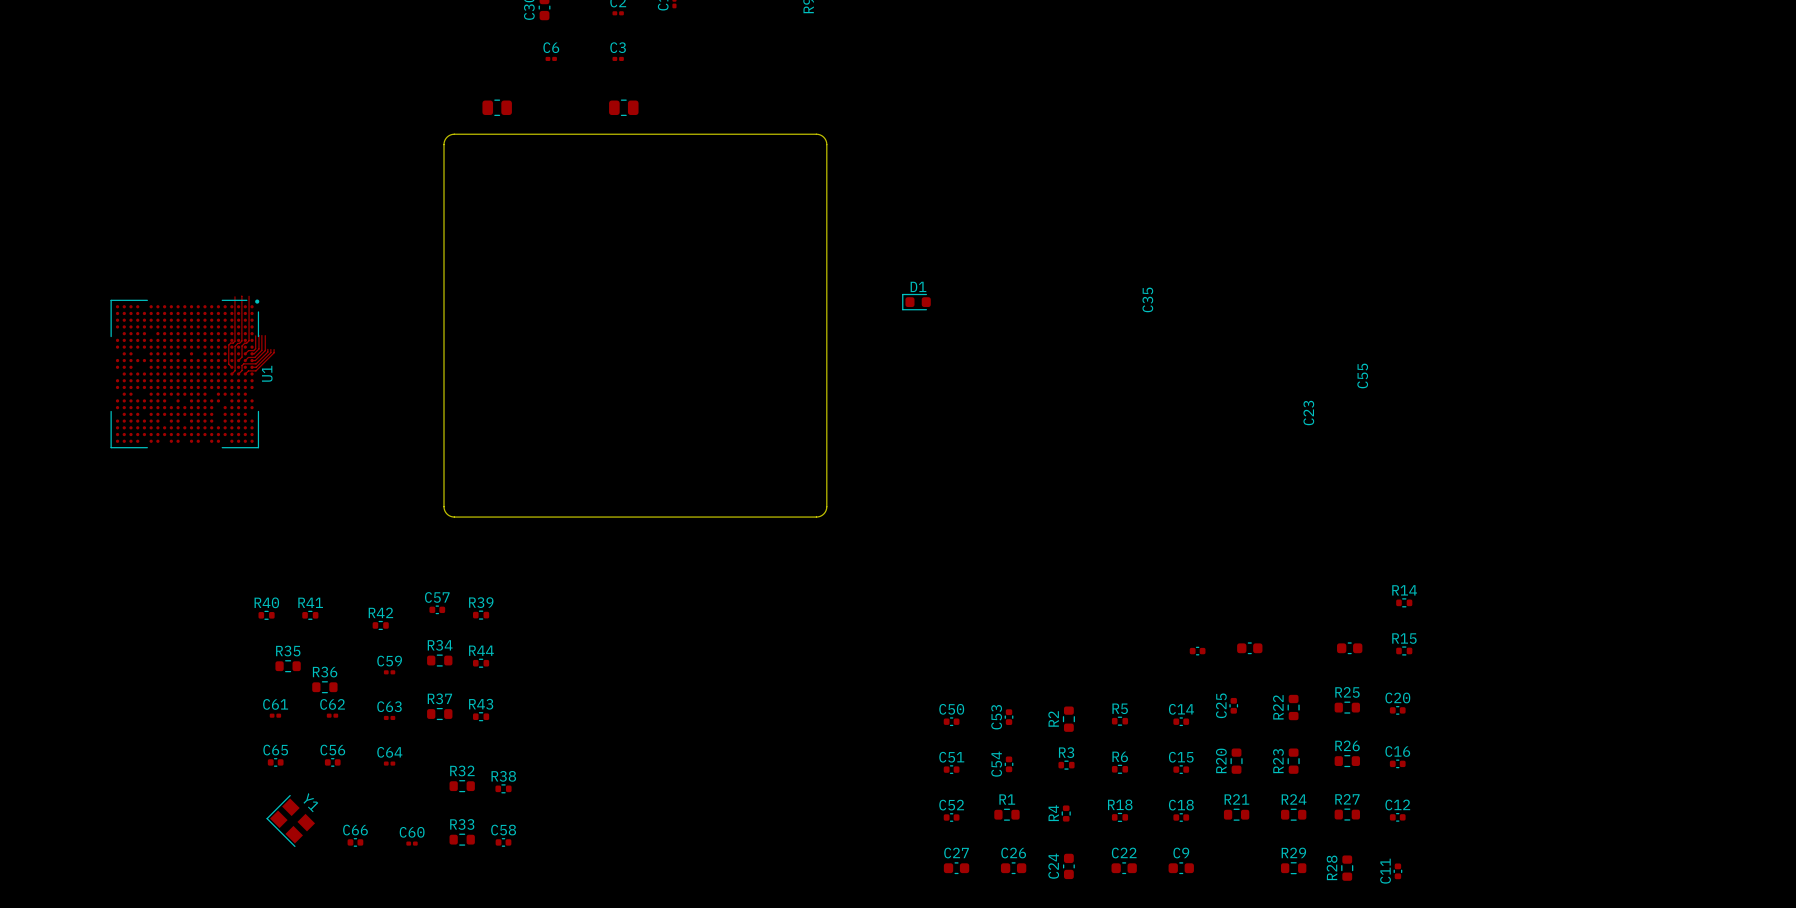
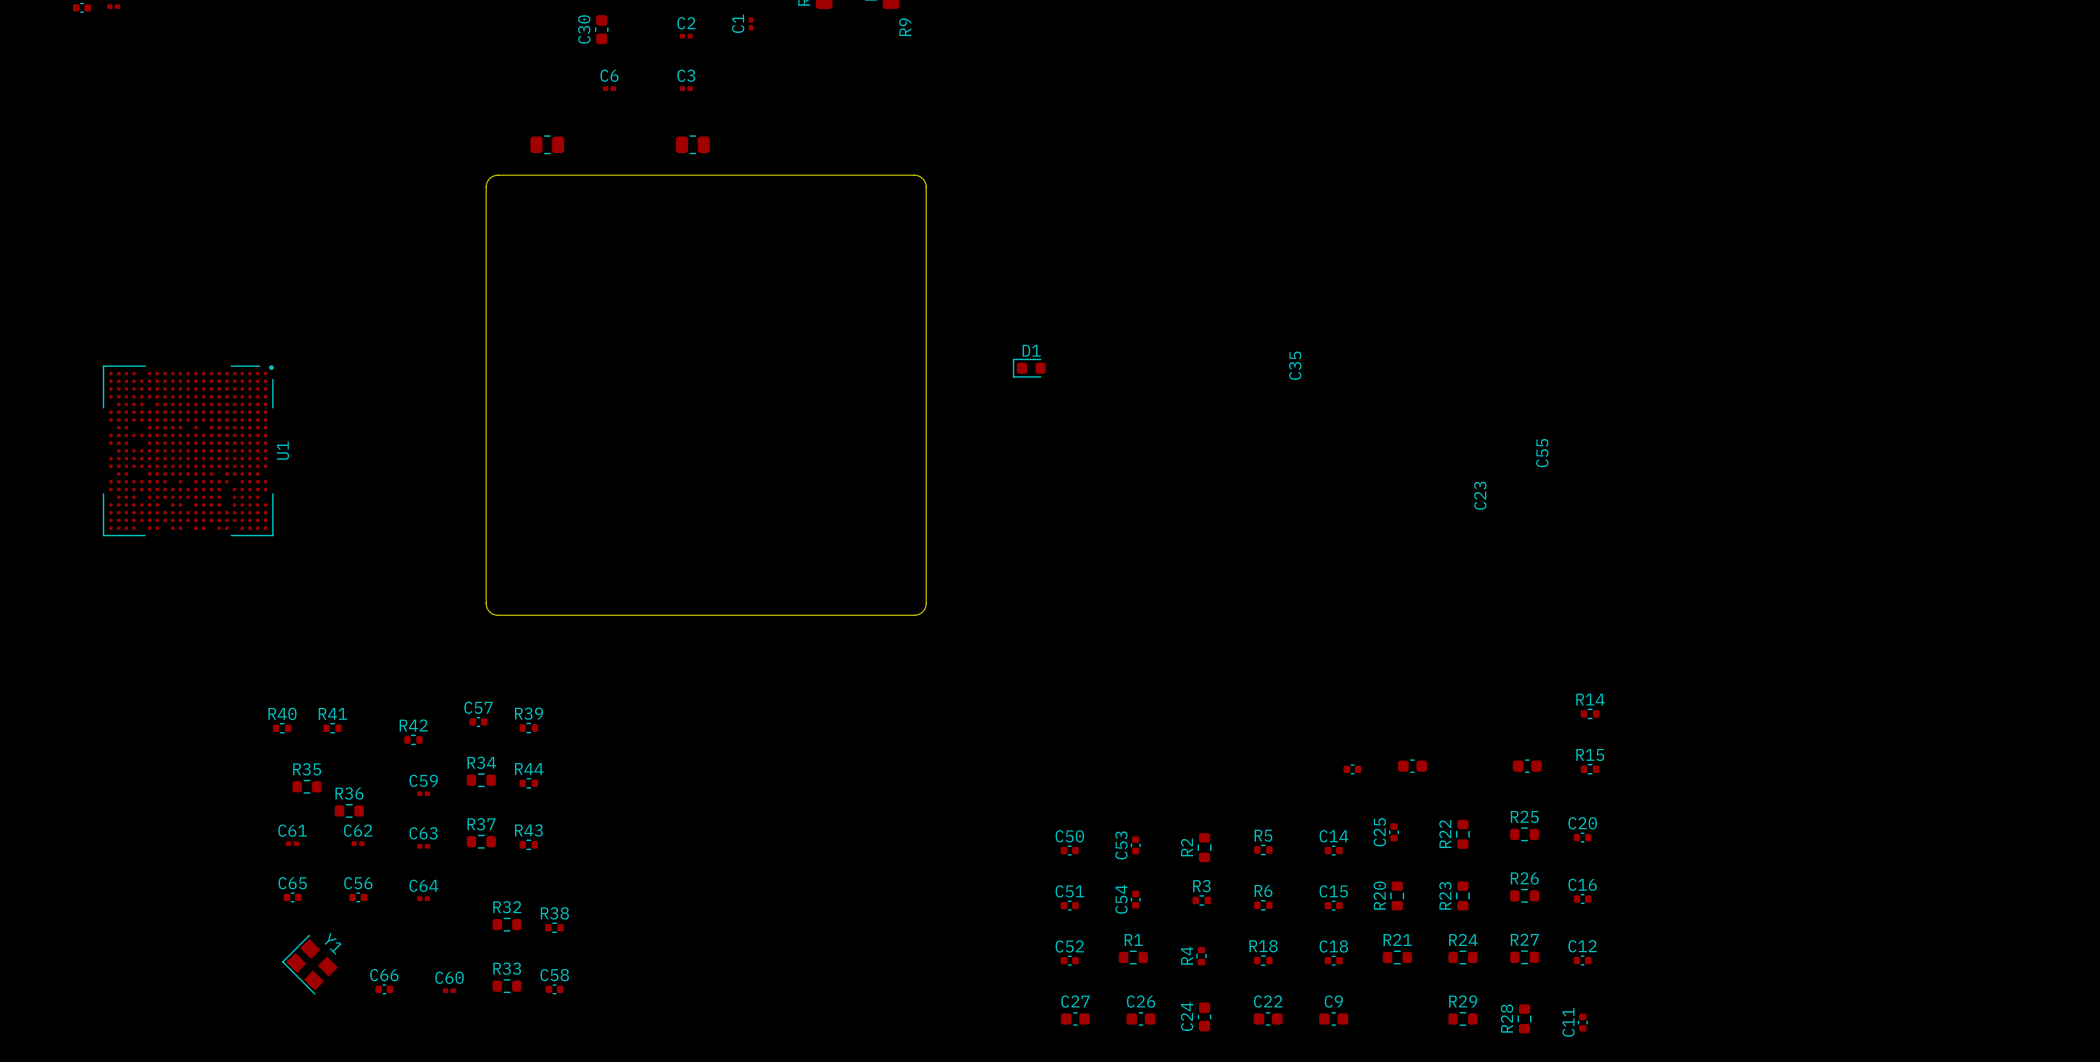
track: (234, 296) (234, 341) (228, 345) (228, 364) (231, 367) -> none
track: (241, 296) (241, 341) (235, 346) (235, 370) (231, 374) -> none
track: (249, 296) (249, 340) (242, 345) (242, 357) (238, 360) -> none
track: (255, 335) (255, 348) (245, 353) -> none
track: (258, 335) (258, 348) (252, 353) -> none
track: (261, 335) (261, 350) (254, 357) (248, 357) (245, 360) -> none
track: (265, 335) (265, 350) (255, 360) (252, 360) -> none
track: (267, 349) (267, 352) (256, 363) (243, 363) (238, 374) -> none
track: (270, 349) (270, 352) (256, 367) (252, 367) -> none
track: (274, 349) (274, 352) (255, 370) (248, 370) (245, 374) -> none

